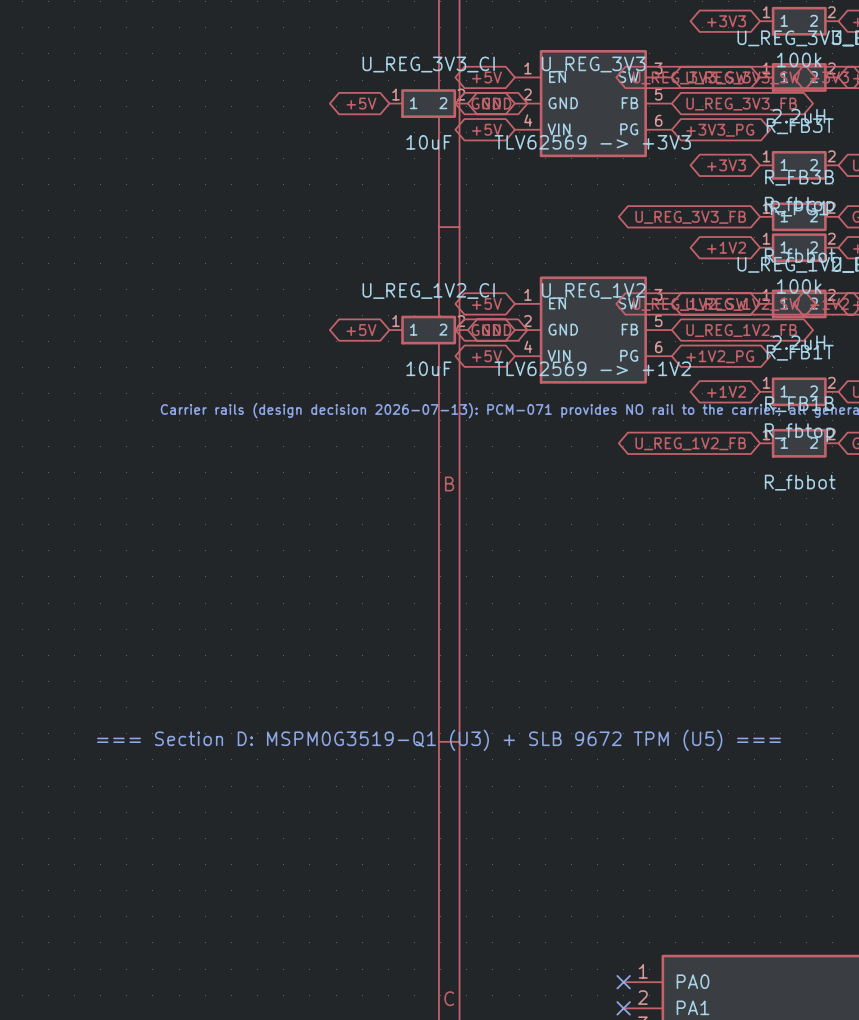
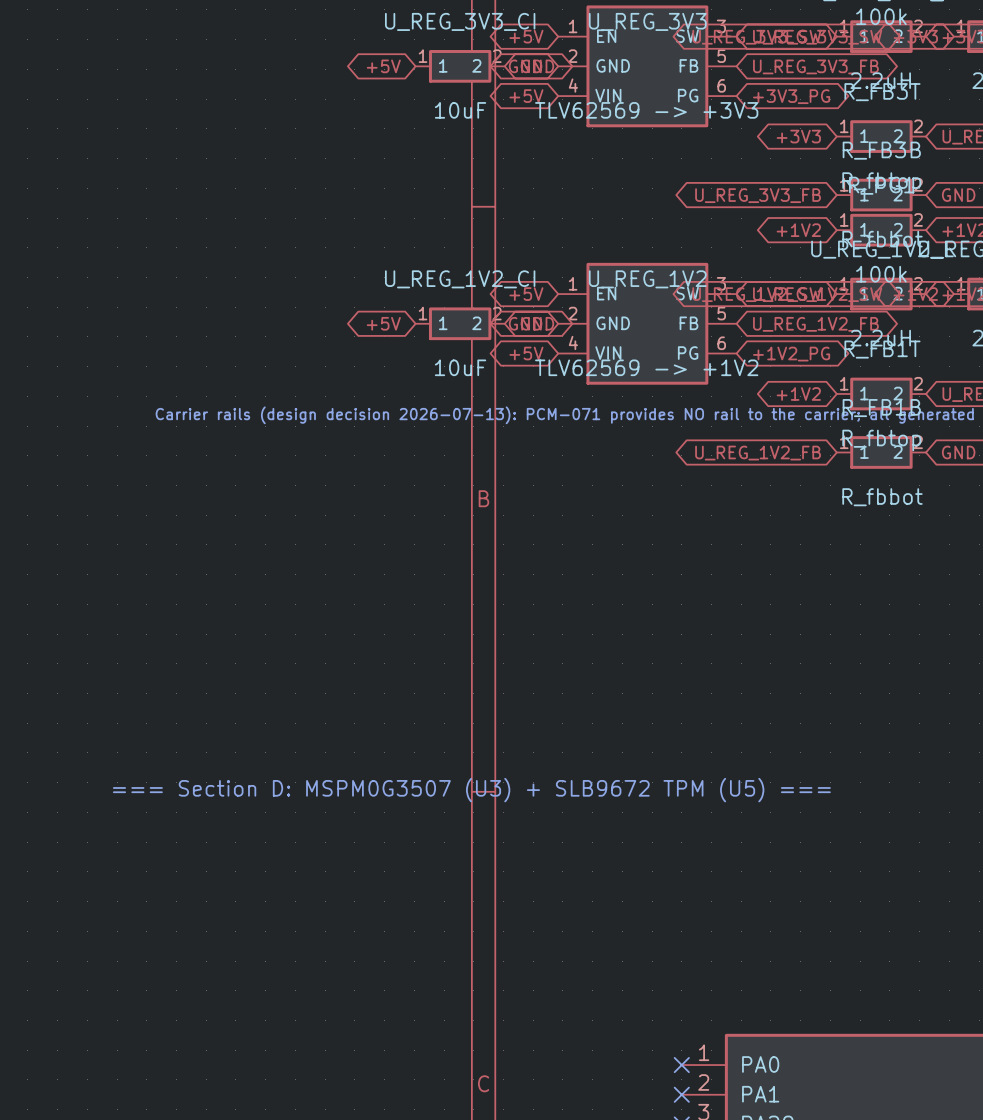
text: === Section D: MSPM0G3519-Q1 (U3) + SLB 9672 TPM (U5) === (438, 740) -> === Section D: MSPM0G3507 (U3) + SLB9672 TPM (U5) === (471, 790)

